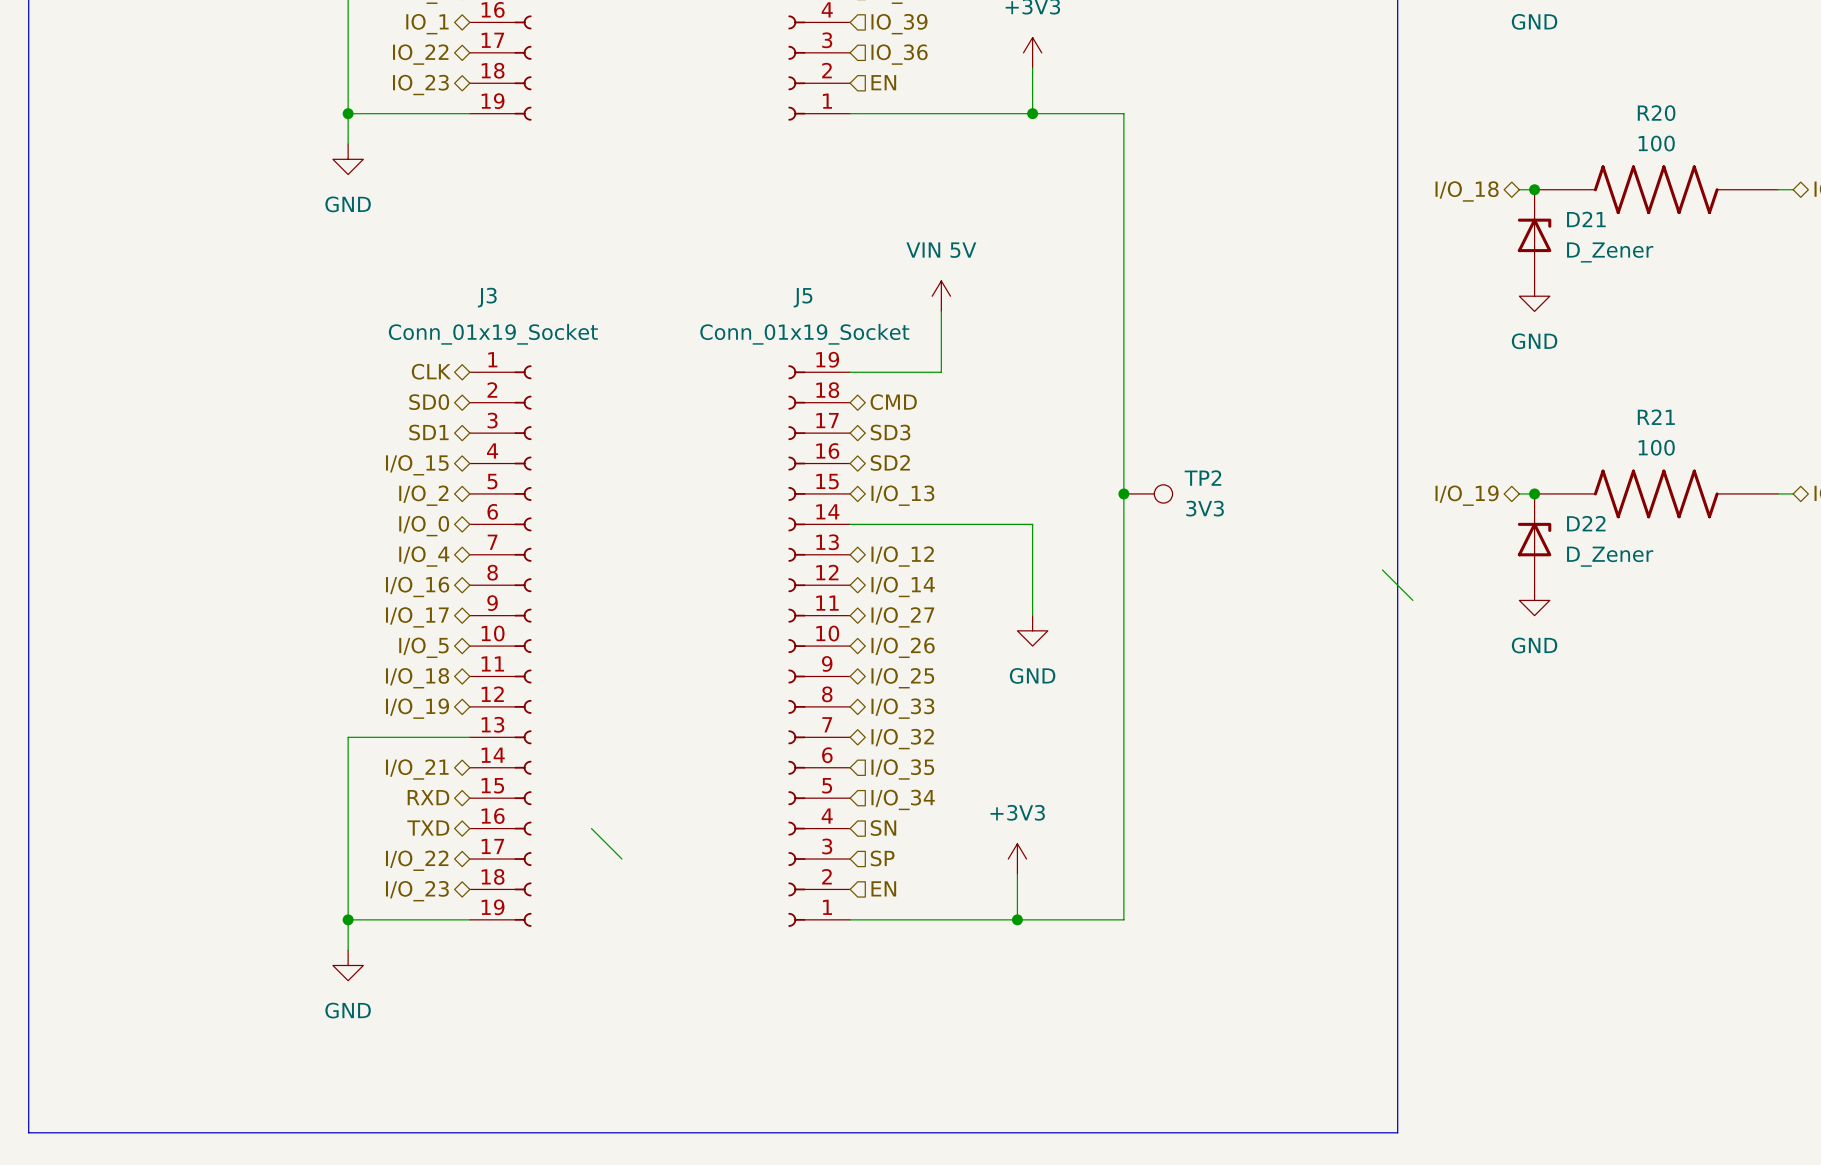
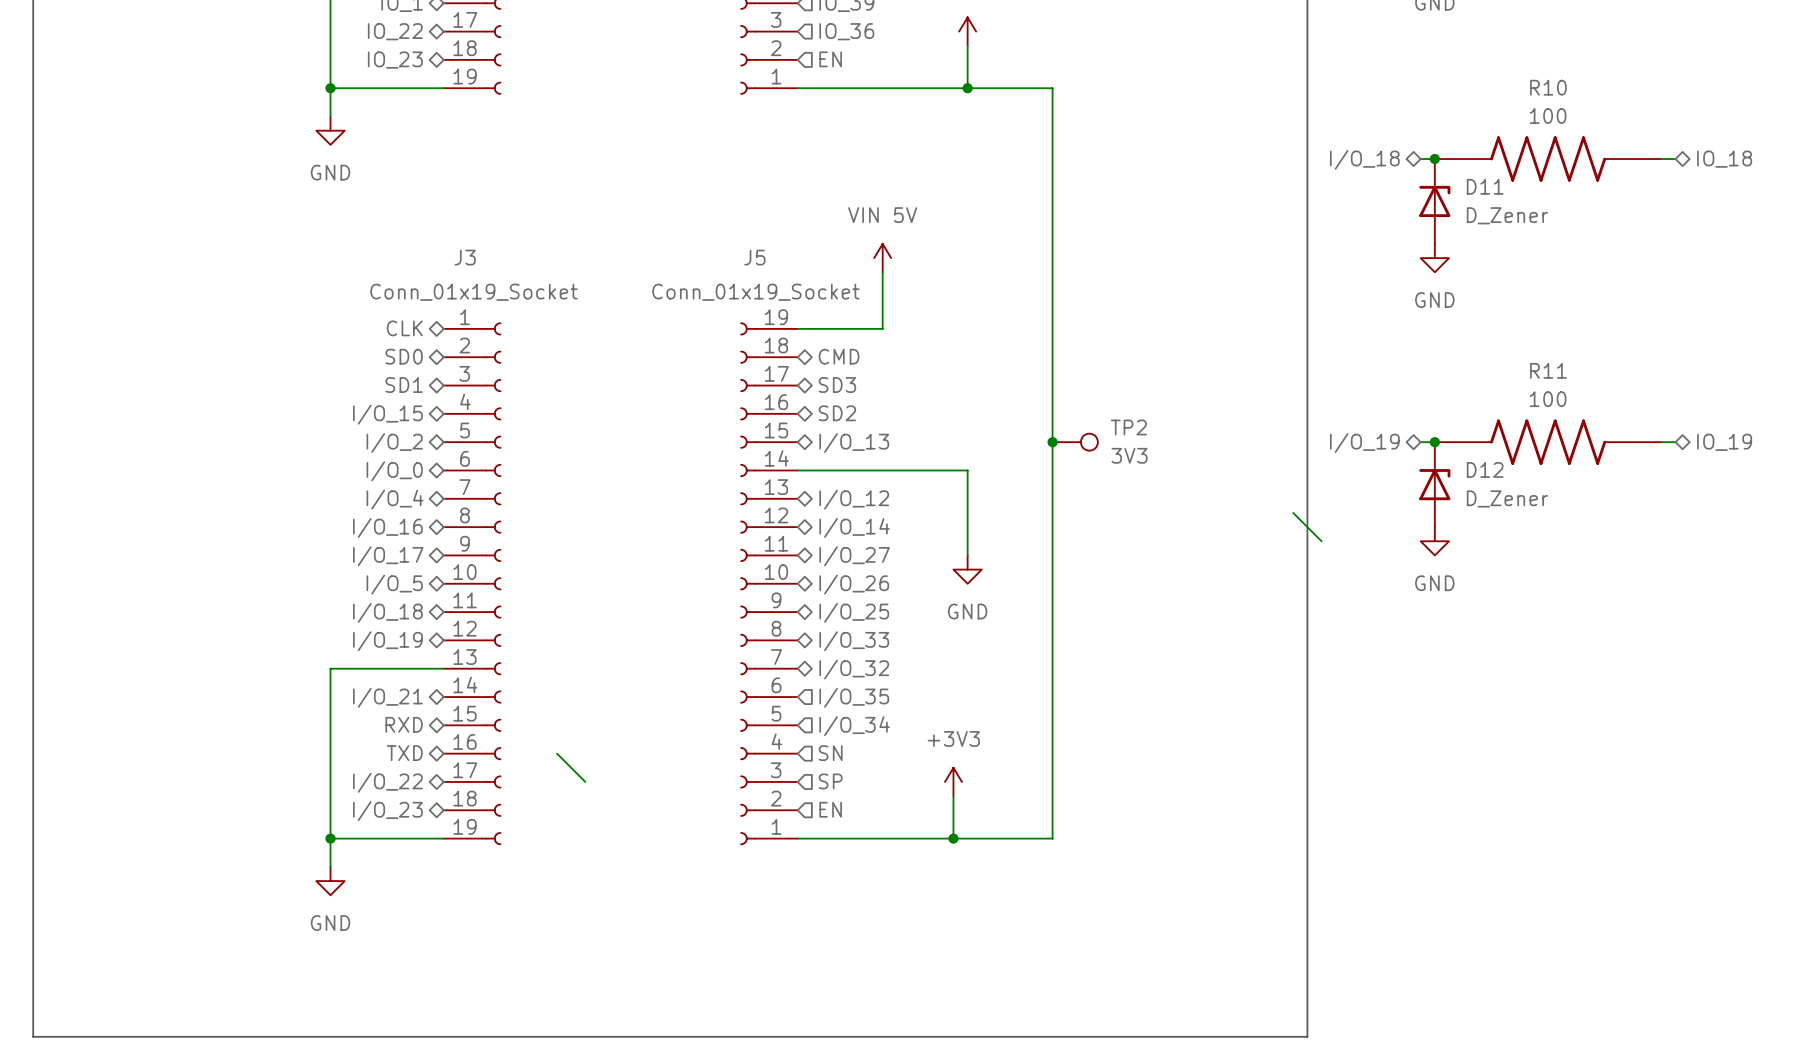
R20 name: R20 (1656, 113) -> R10 (1548, 87)
D21 name: D21 (1586, 219) -> D11 (1485, 186)
R21 name: R21 (1656, 417) -> R11 (1548, 370)
D22 name: D22 (1586, 523) -> D12 (1485, 469)

